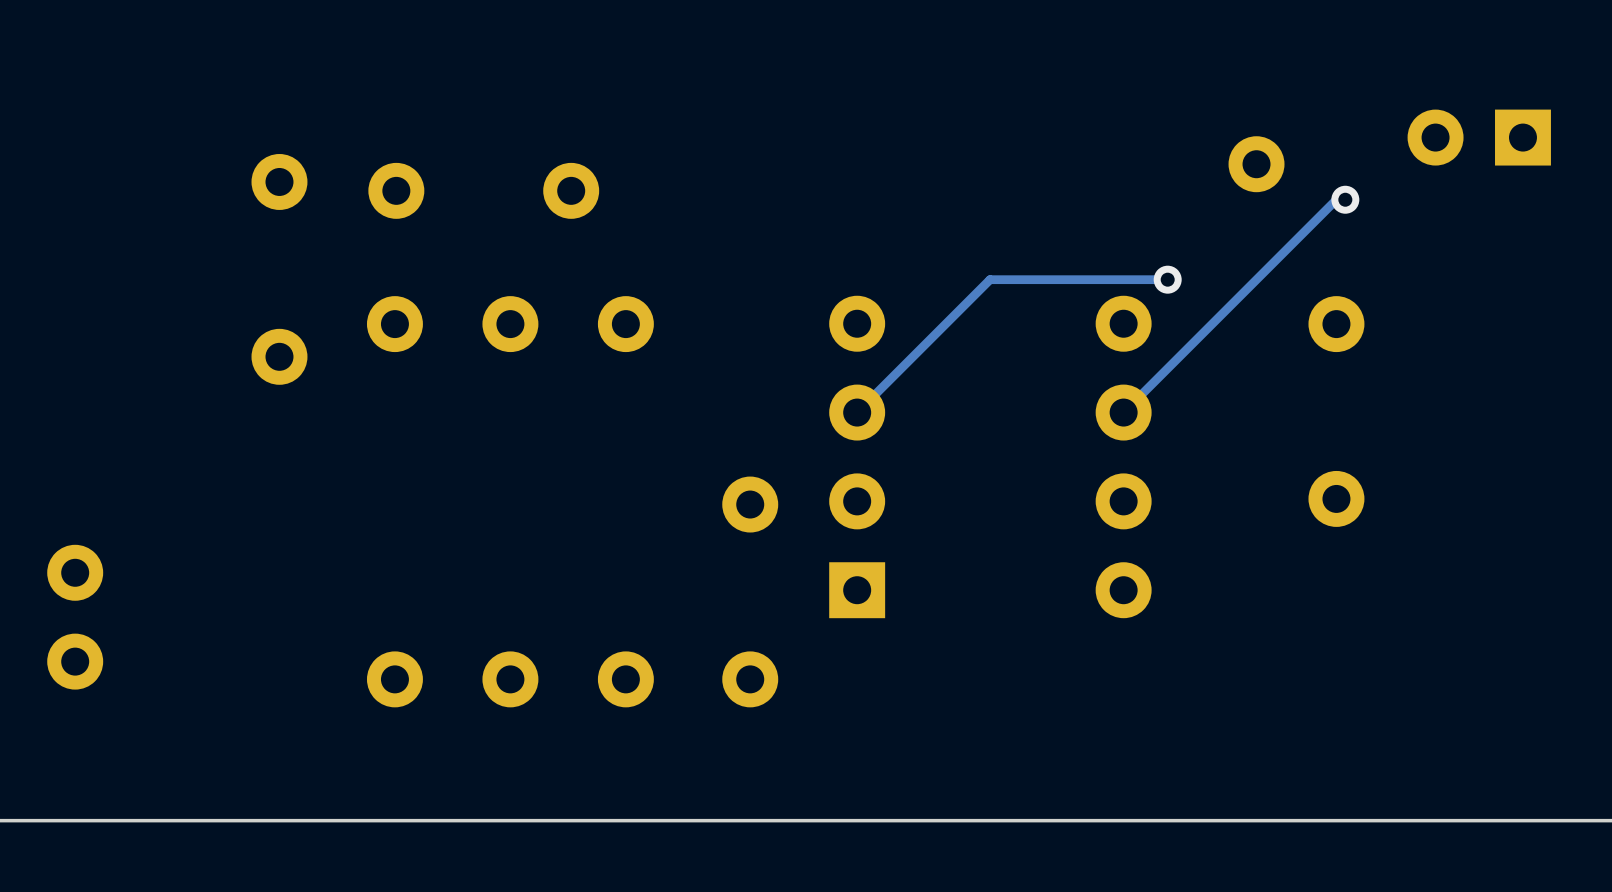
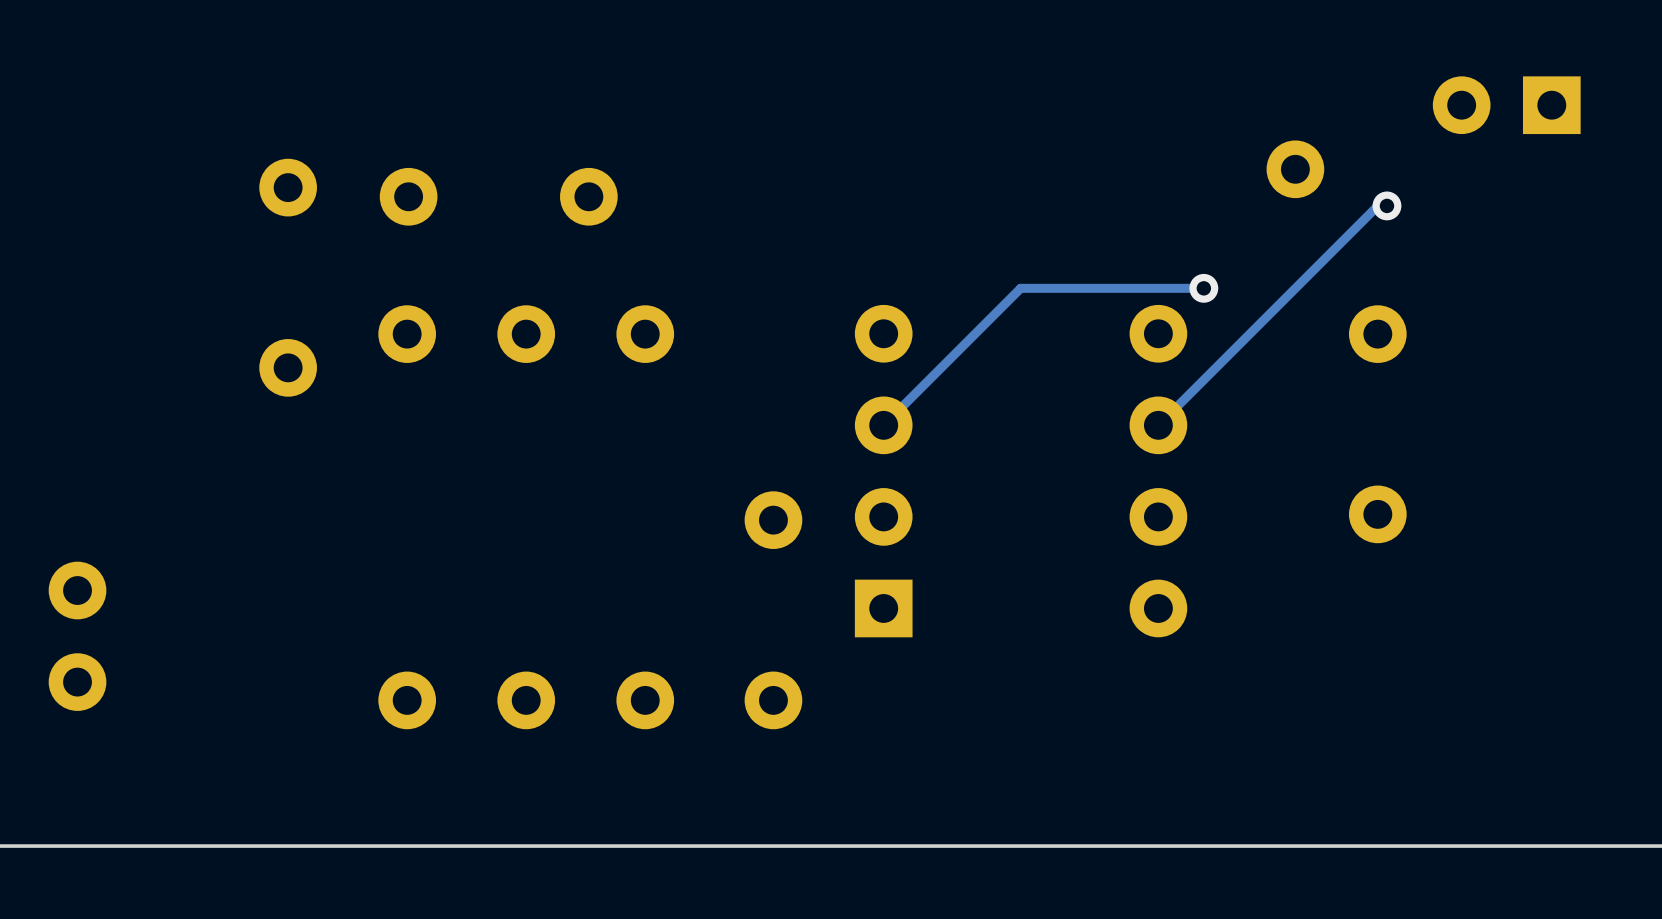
part position: (1479, 137) -> (1506, 105)

